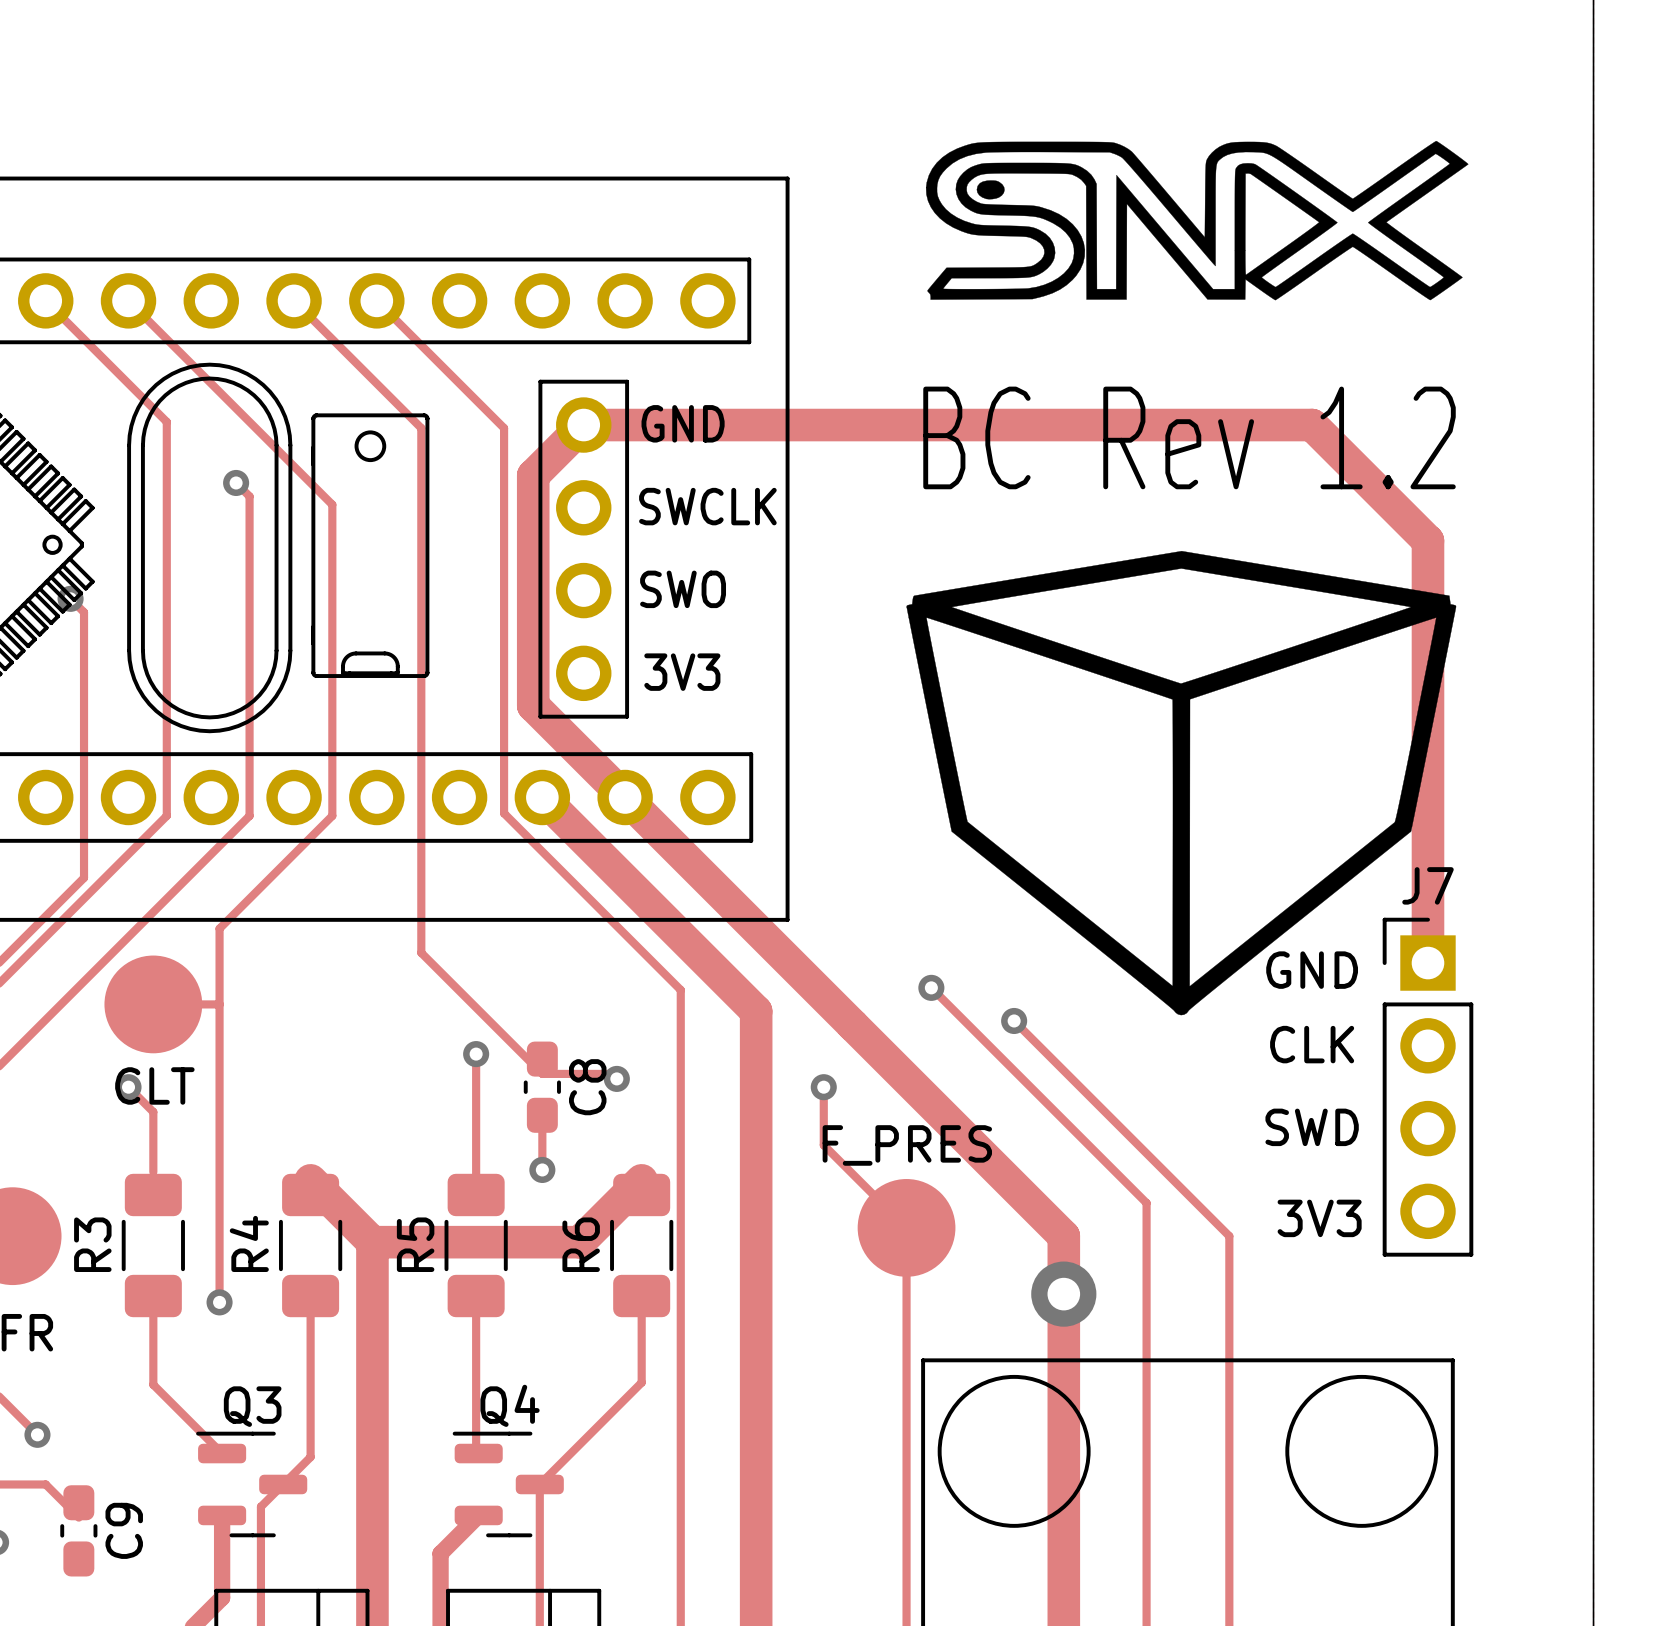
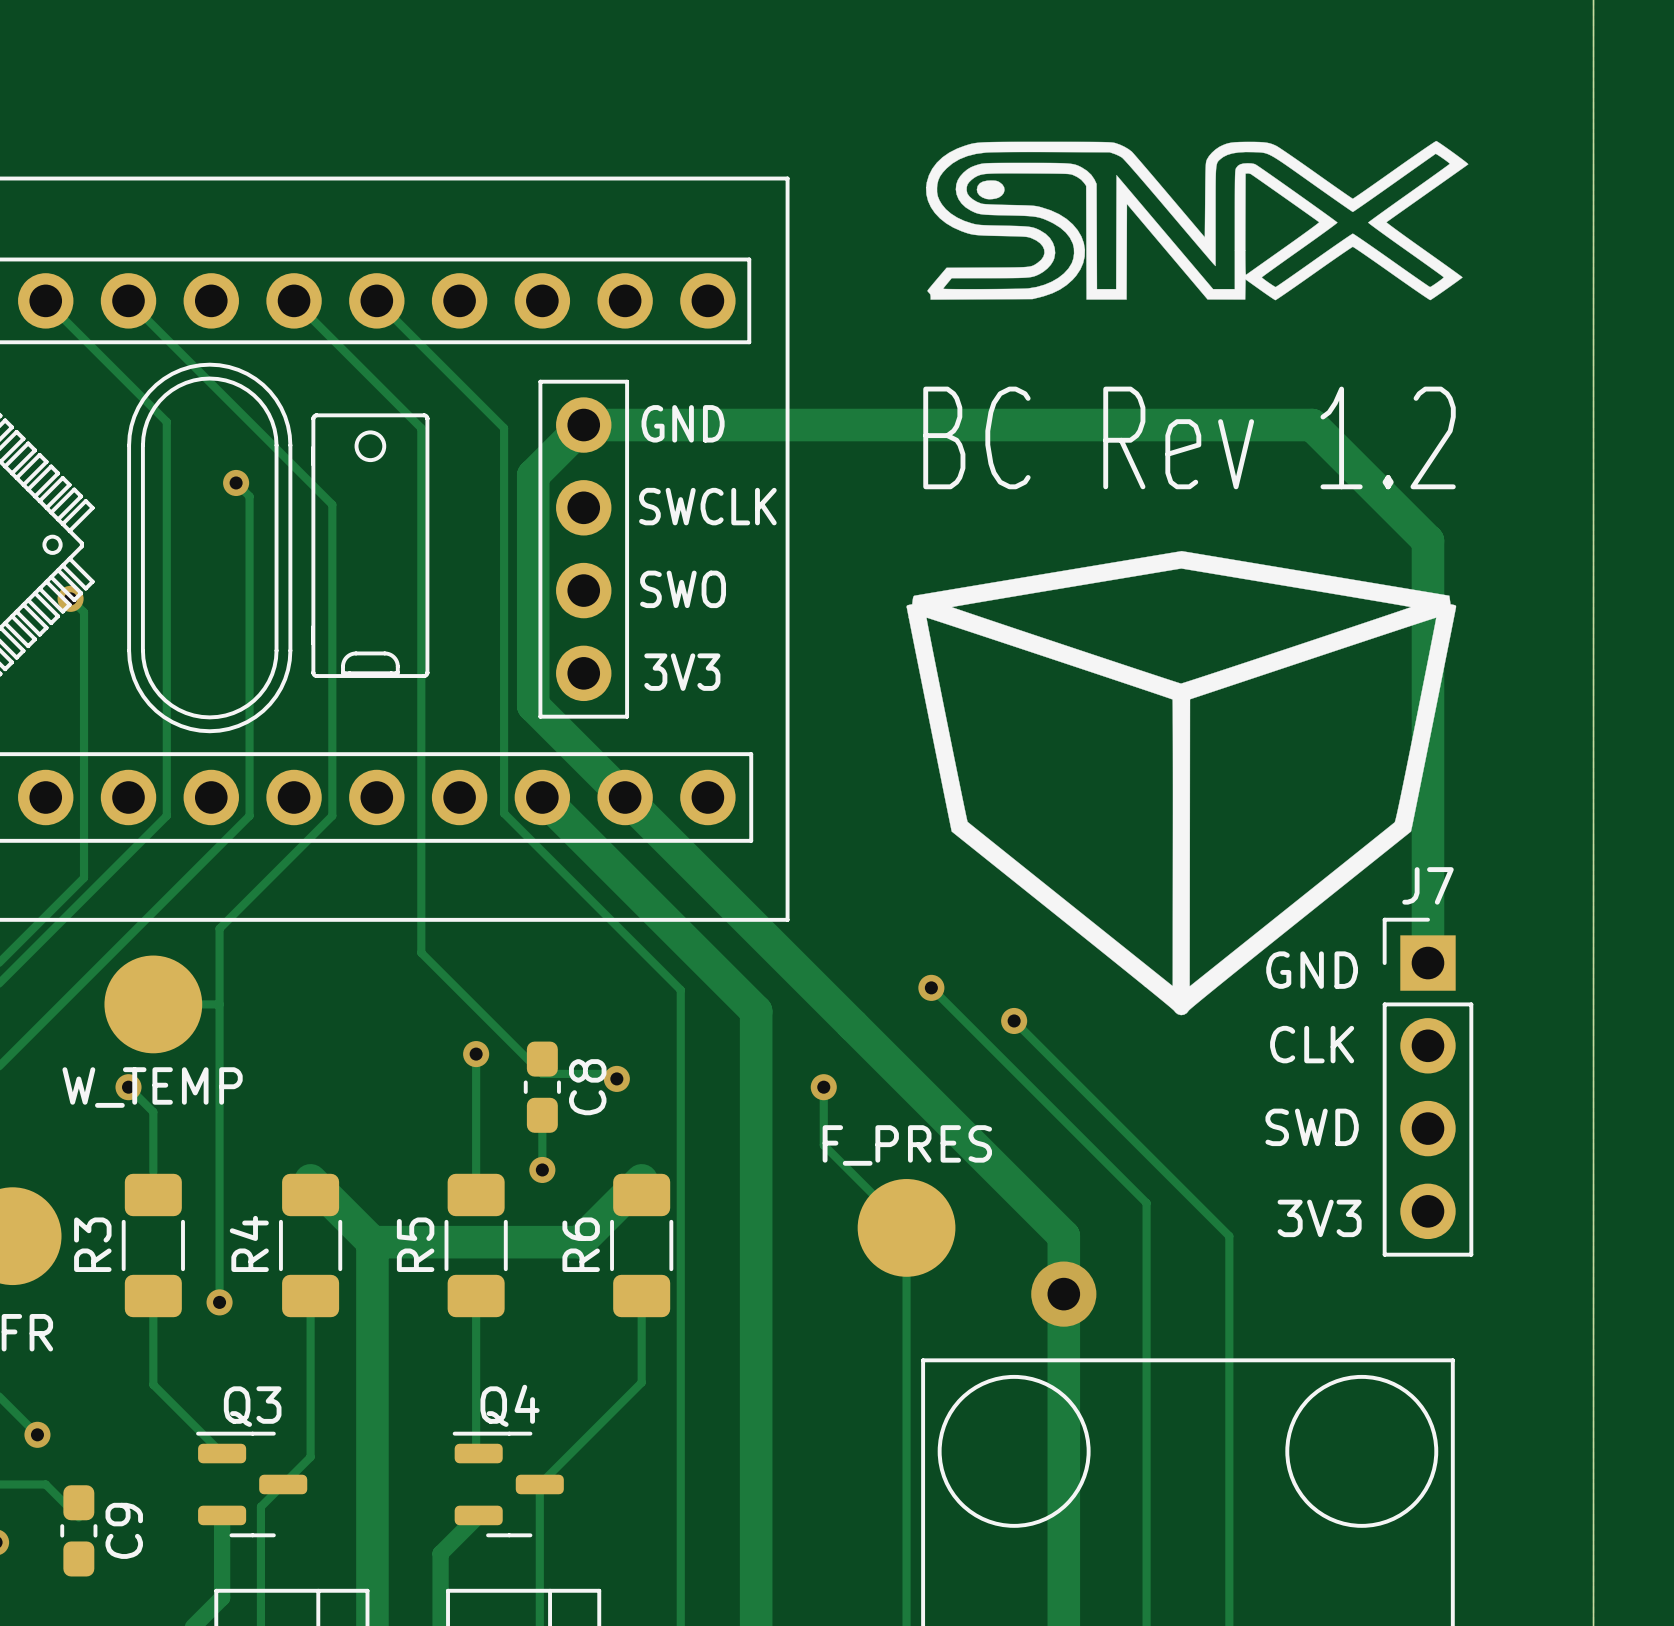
part value: CLT (154, 1085) -> W_TEMP (152, 1087)

